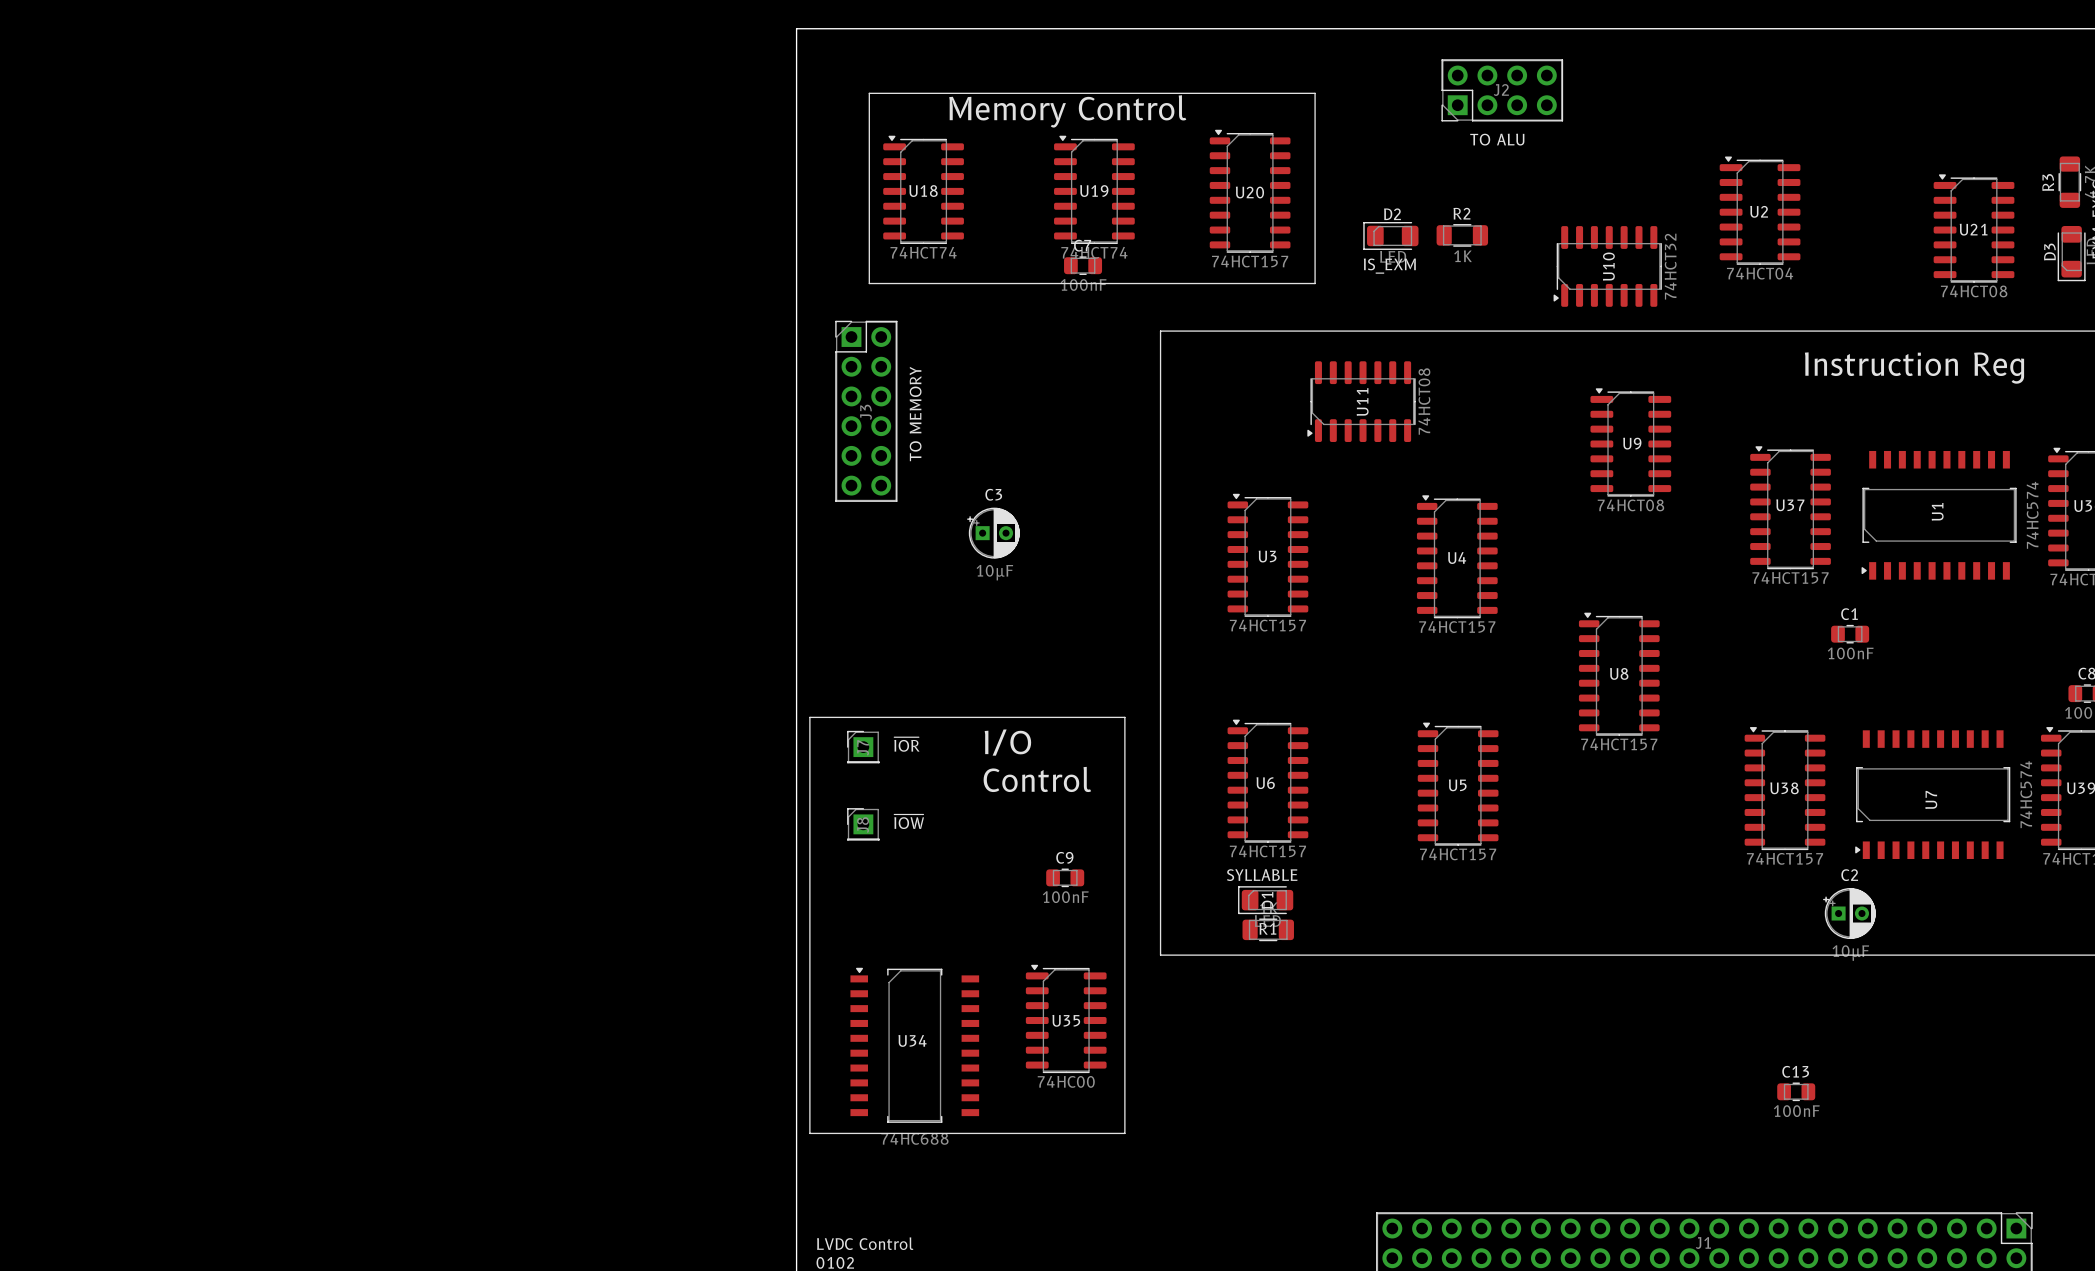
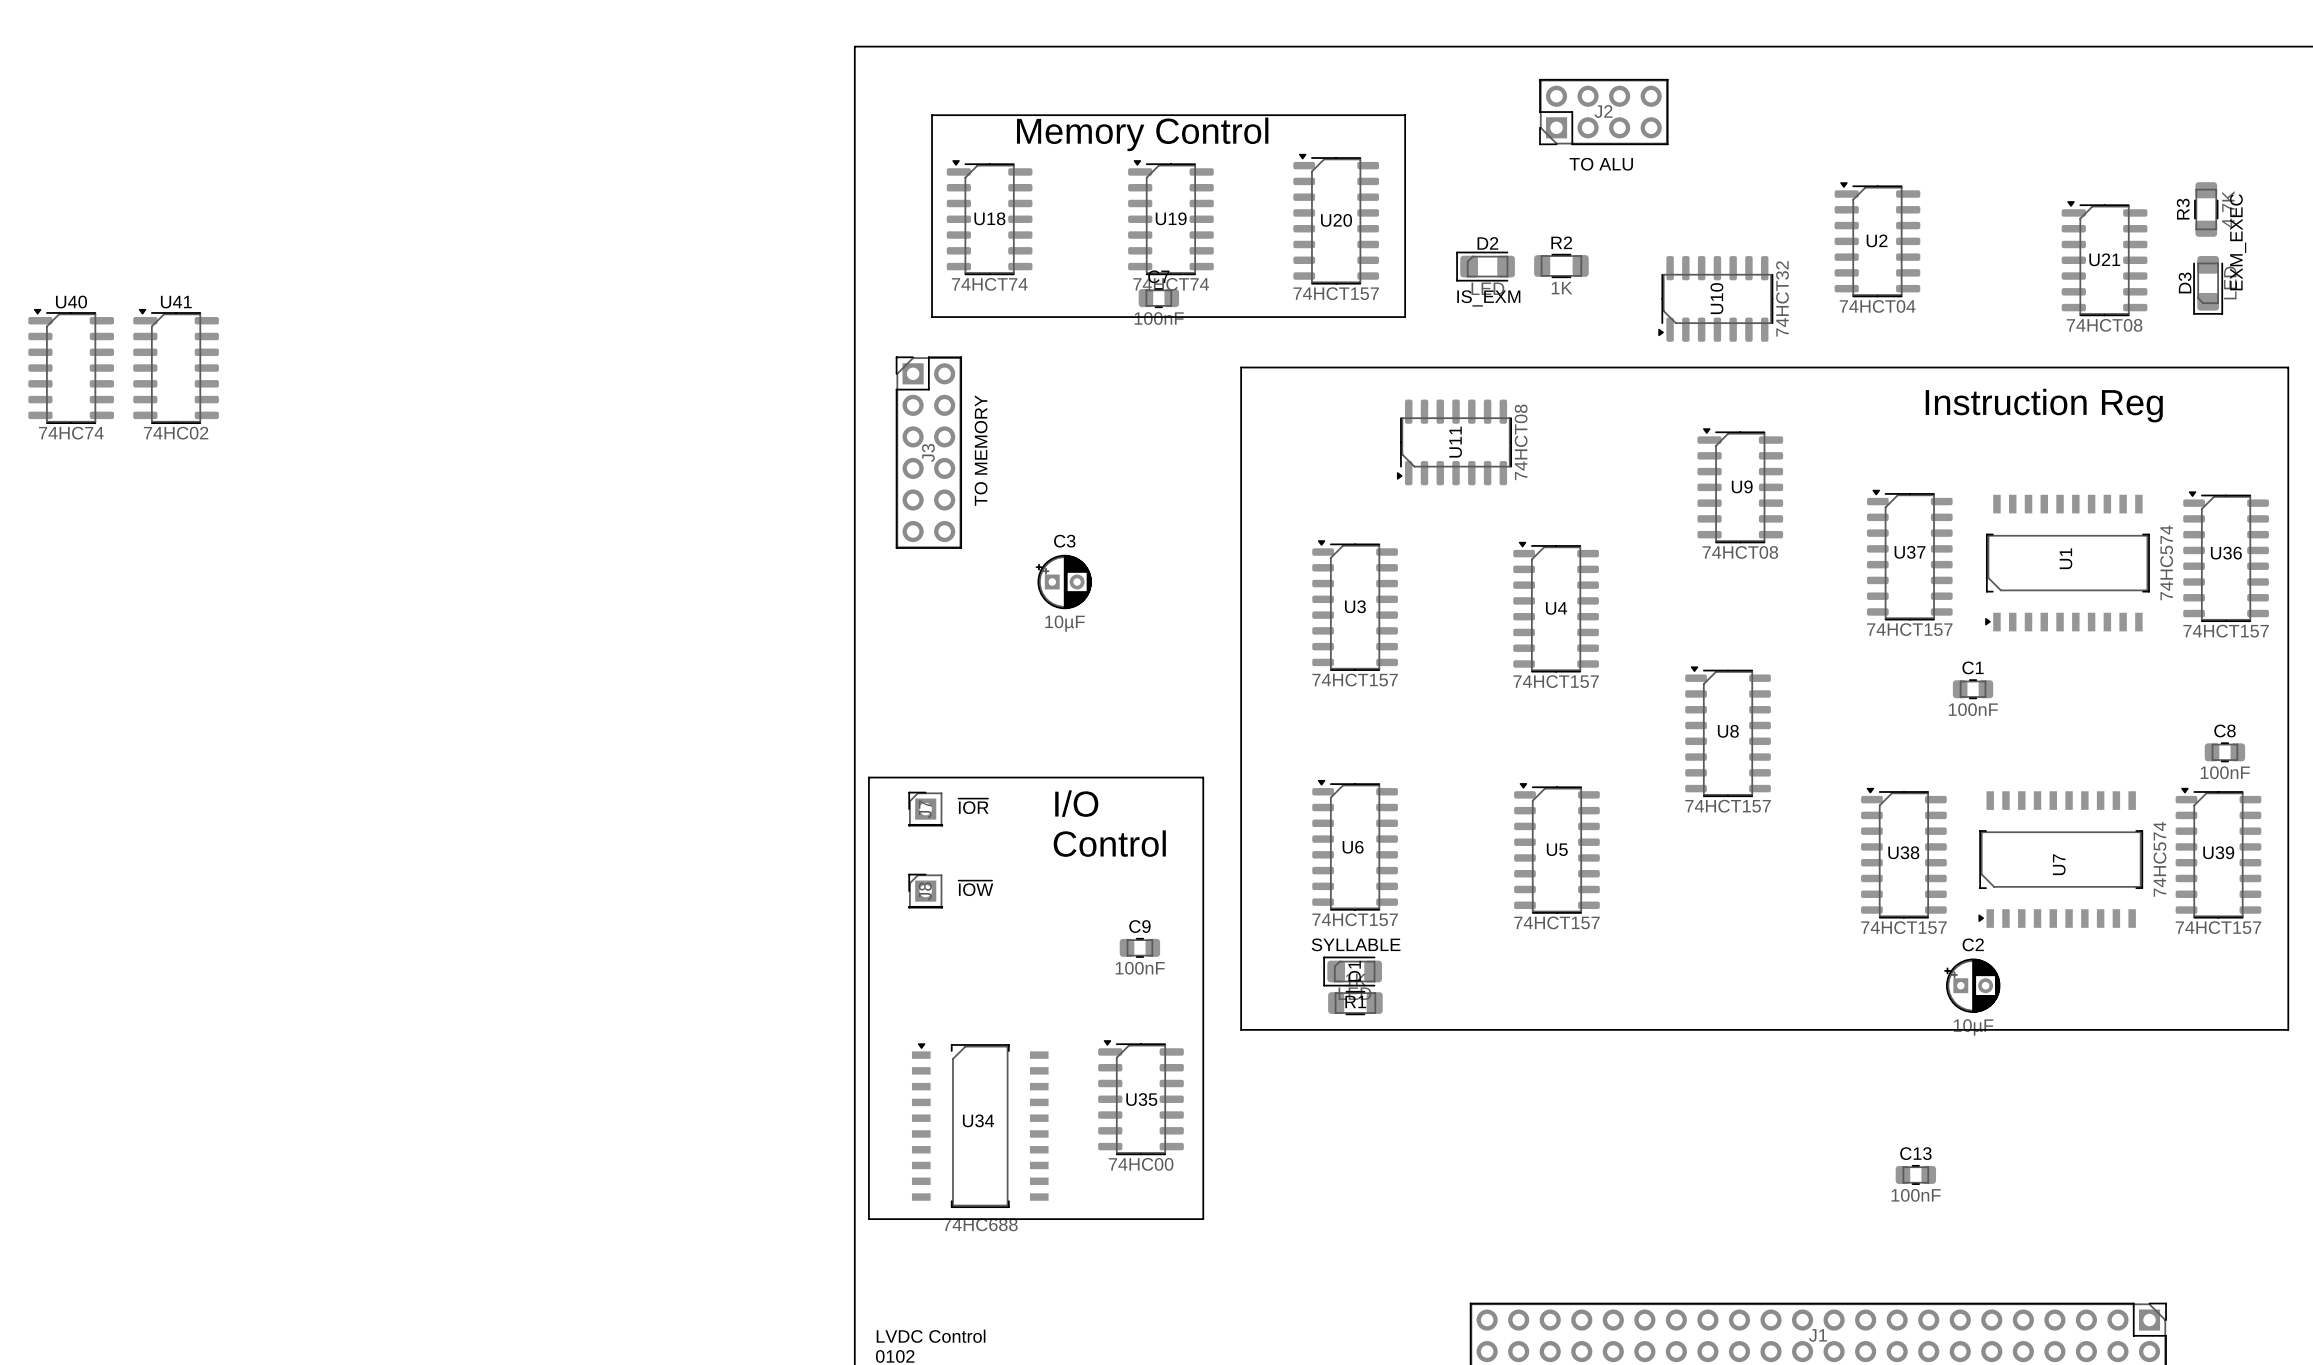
U40: none -> 74HC74 (71, 366)
U41: none -> 74HC02 (176, 366)

